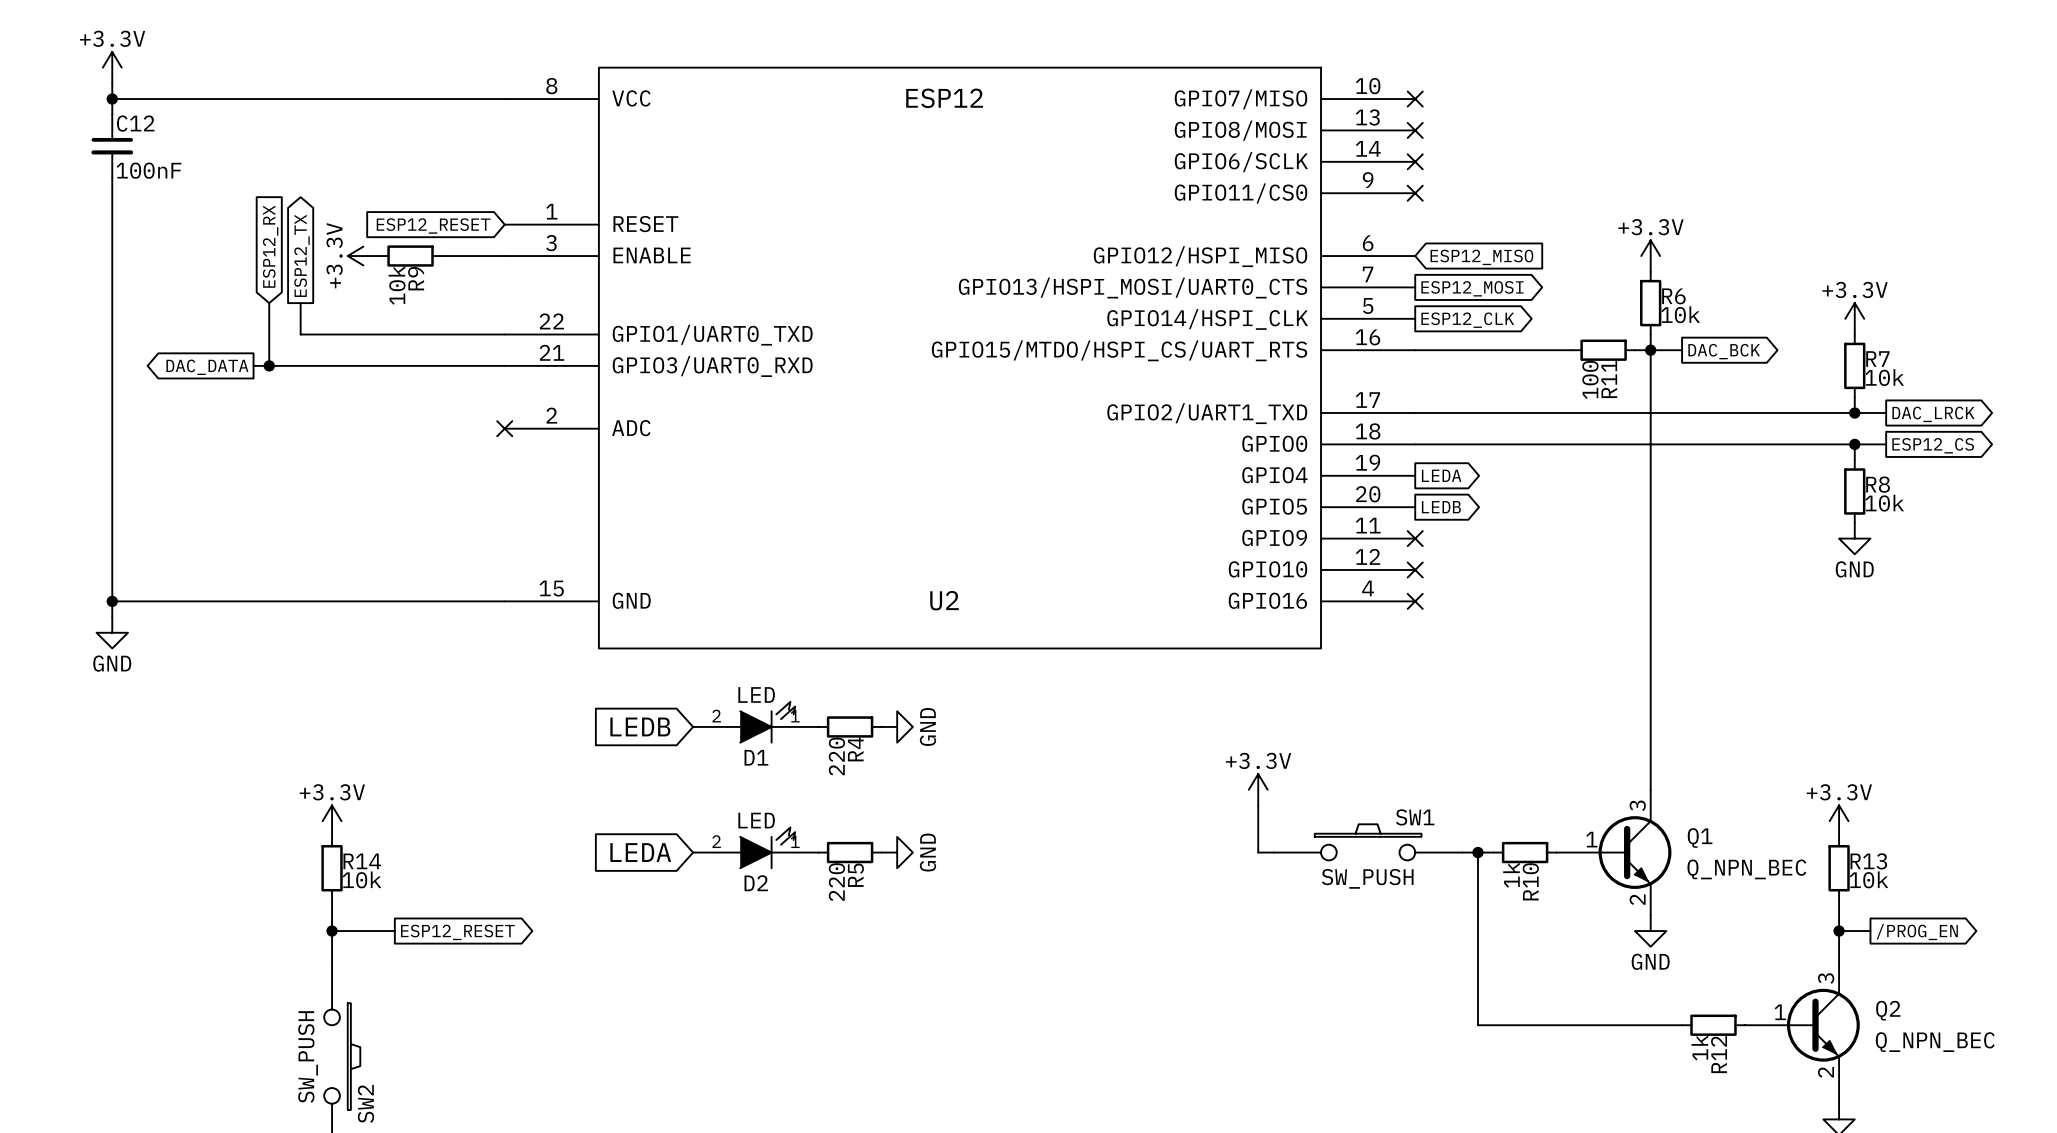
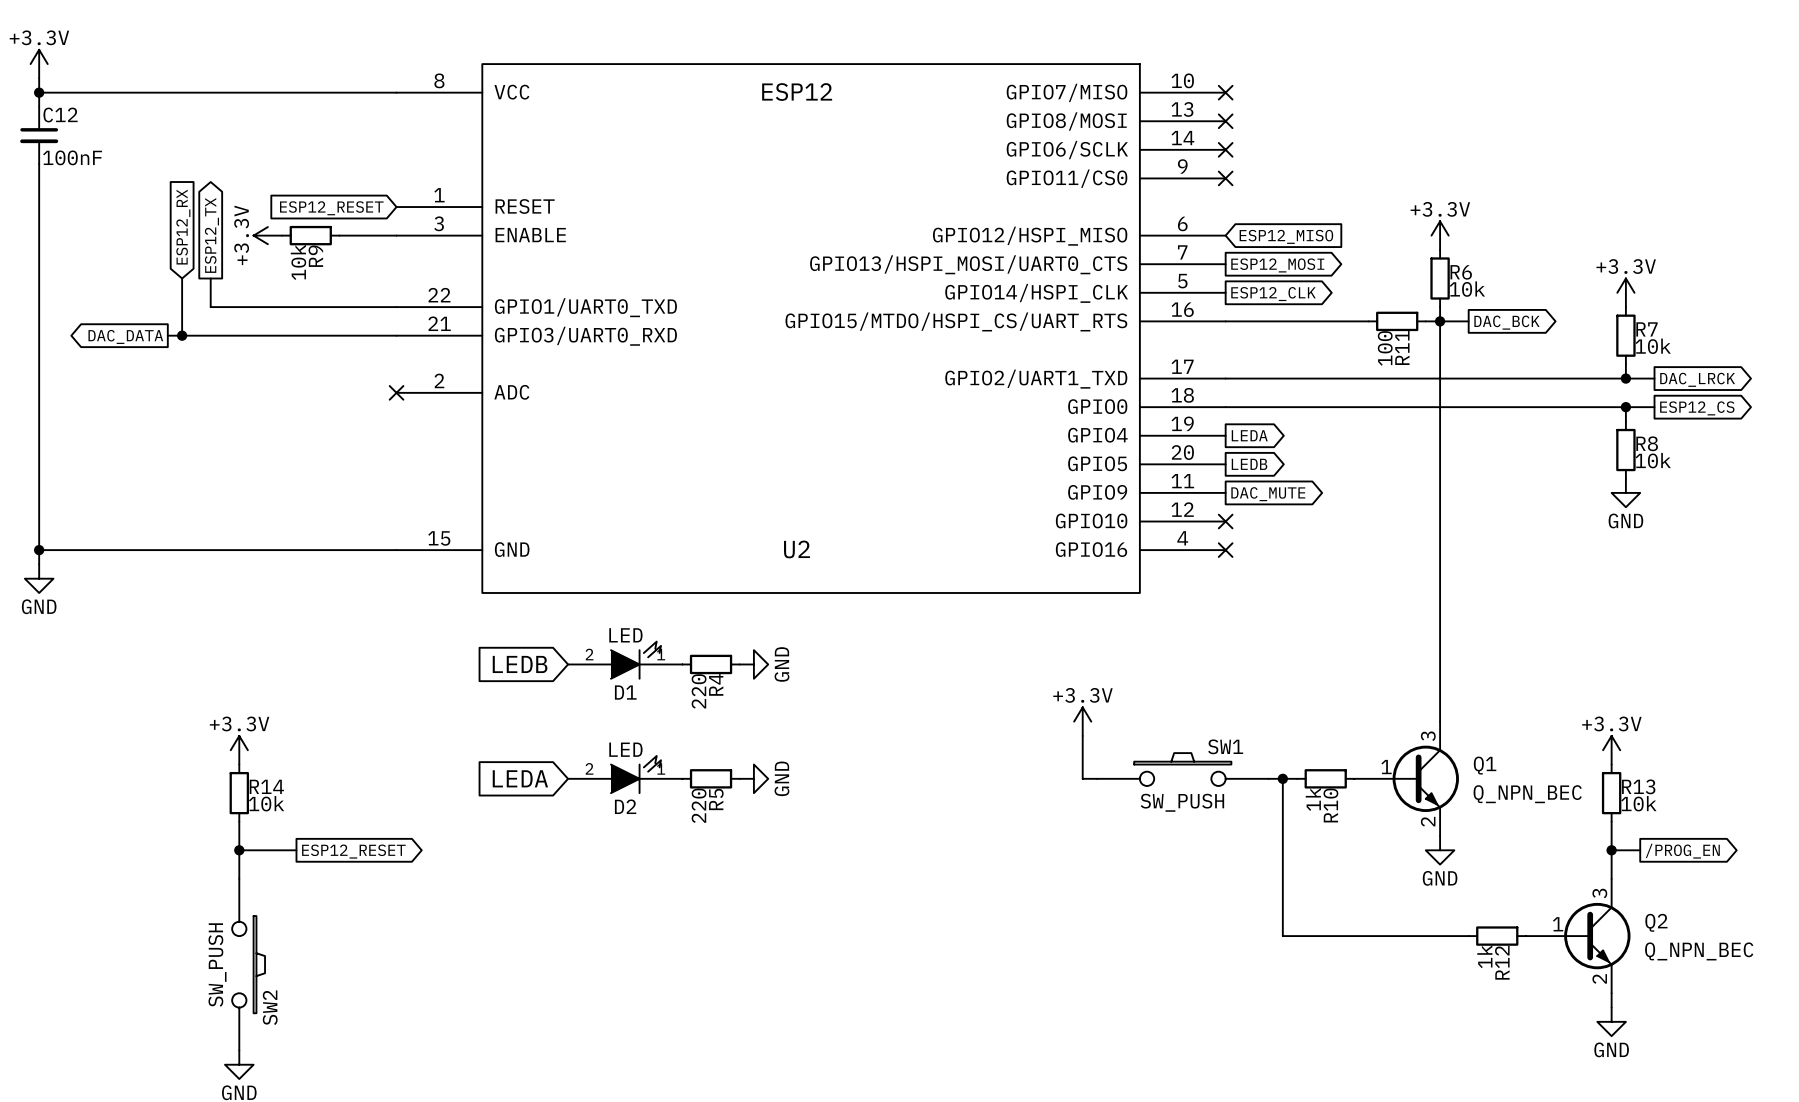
no-connect mark: (1415, 538) -> none
global label: none -> DAC_MUTE (1268, 494)

